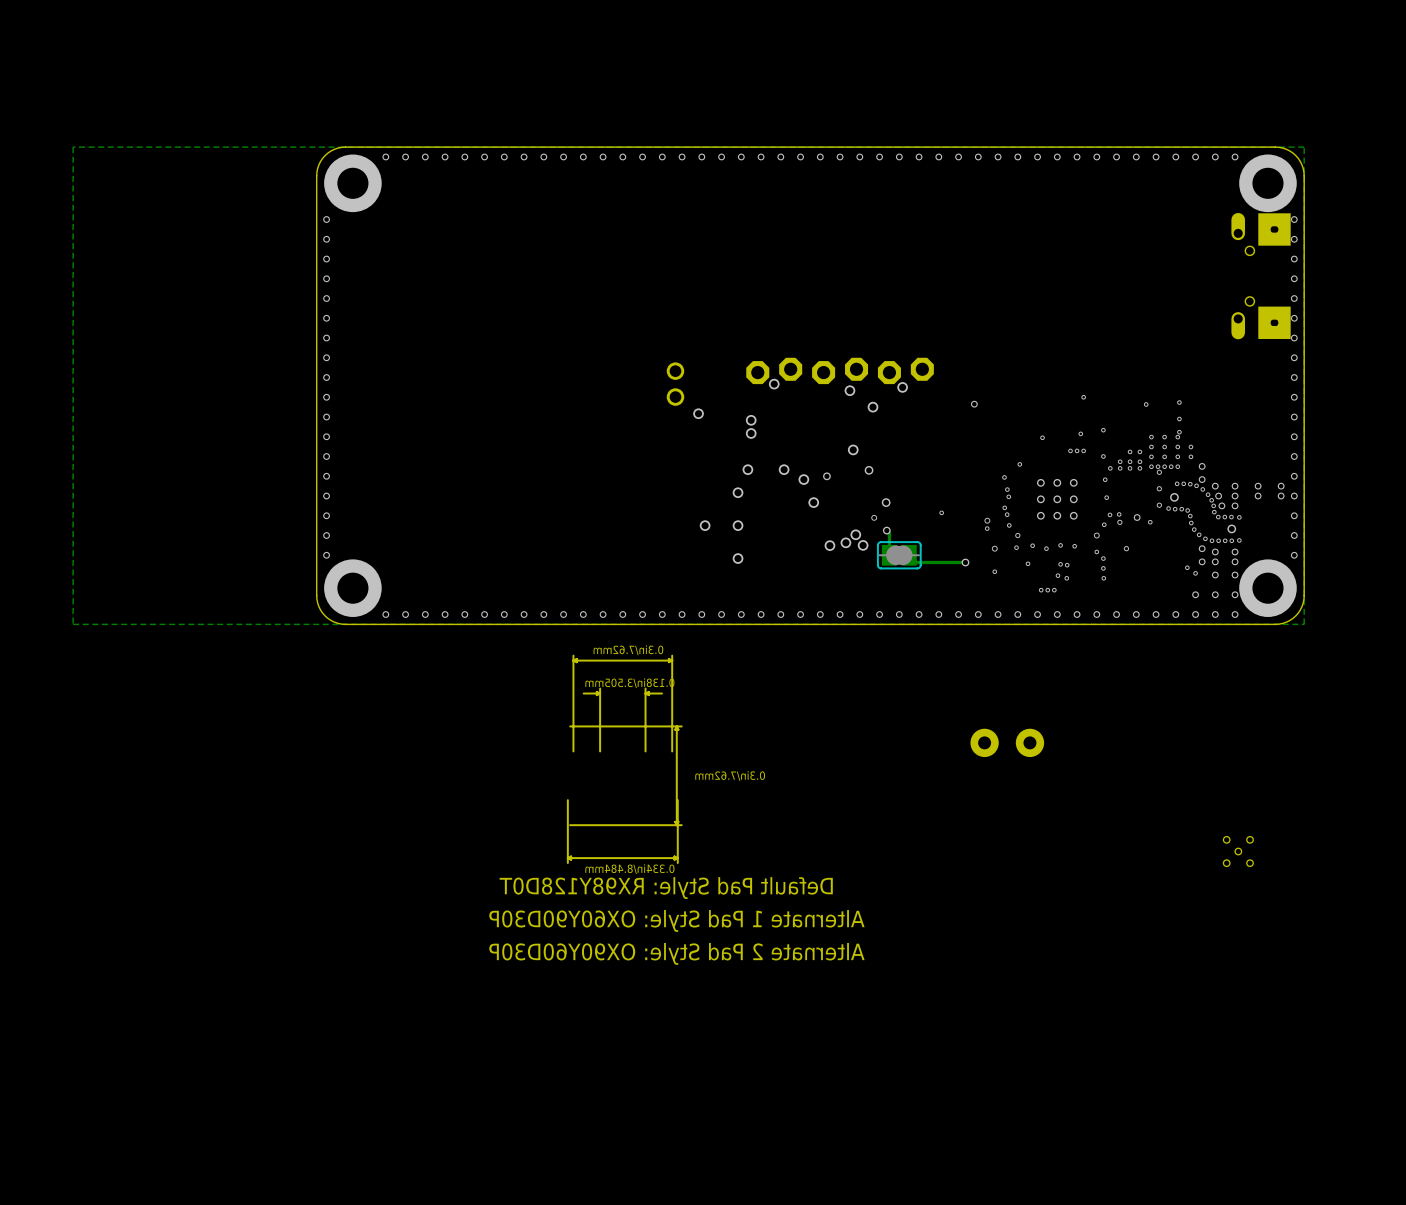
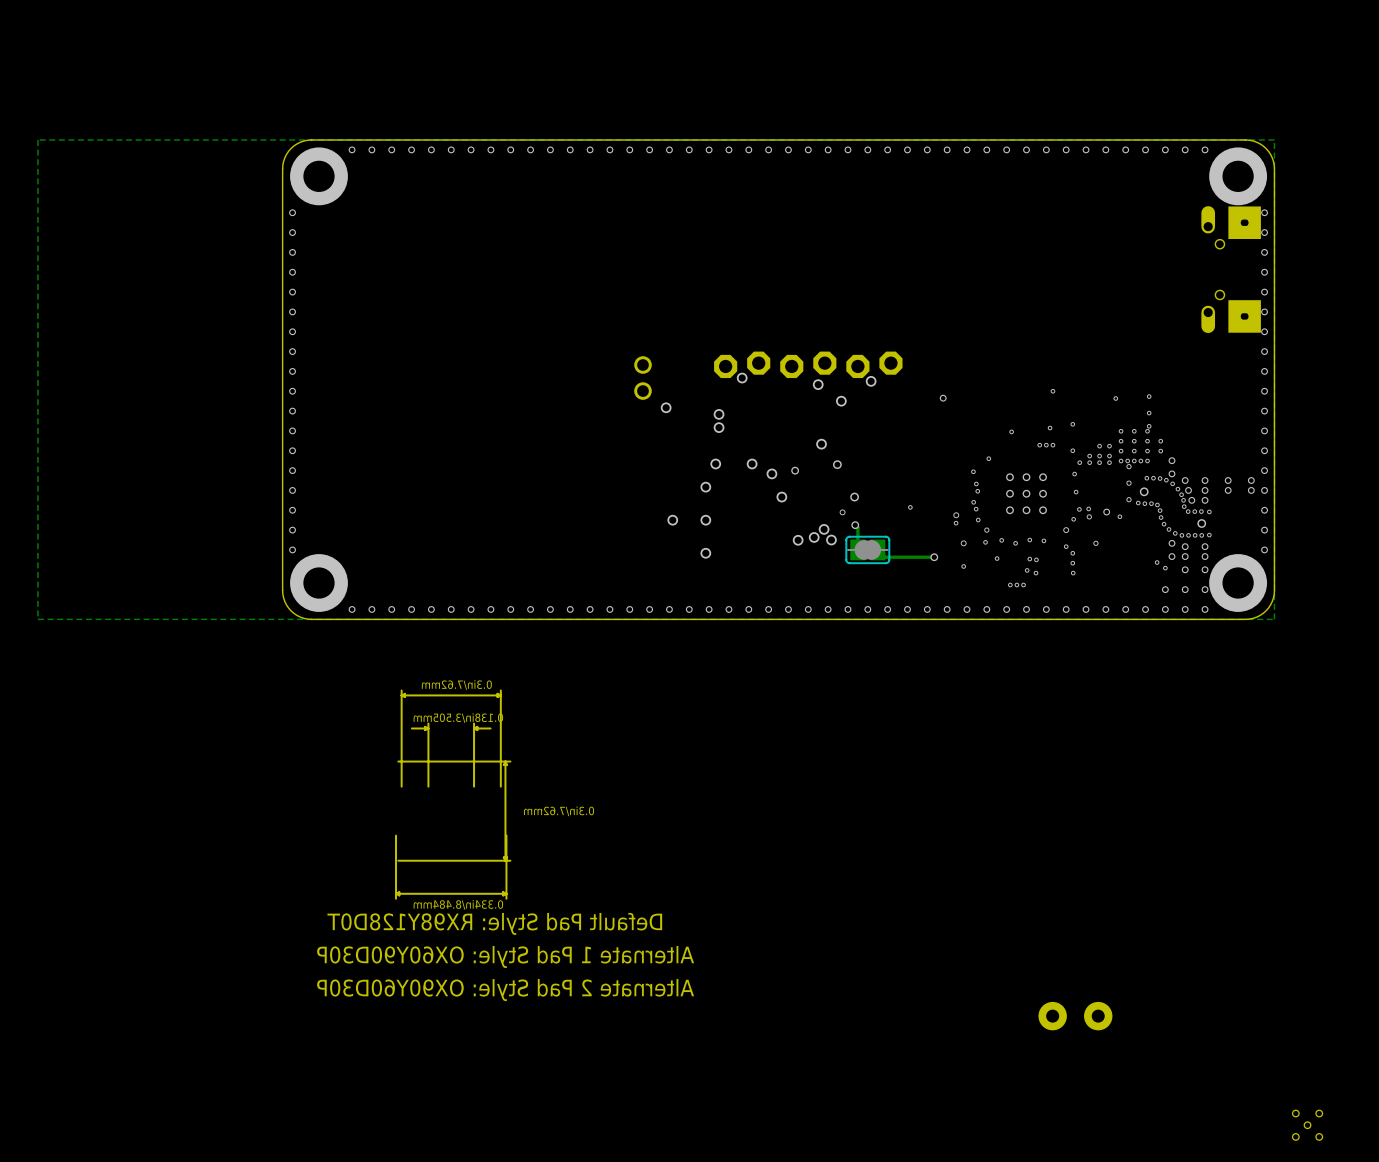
part position: (1007, 742) -> (1075, 1016)
part position: (624, 759) -> (453, 794)
part position: (1238, 851) -> (1307, 1125)

